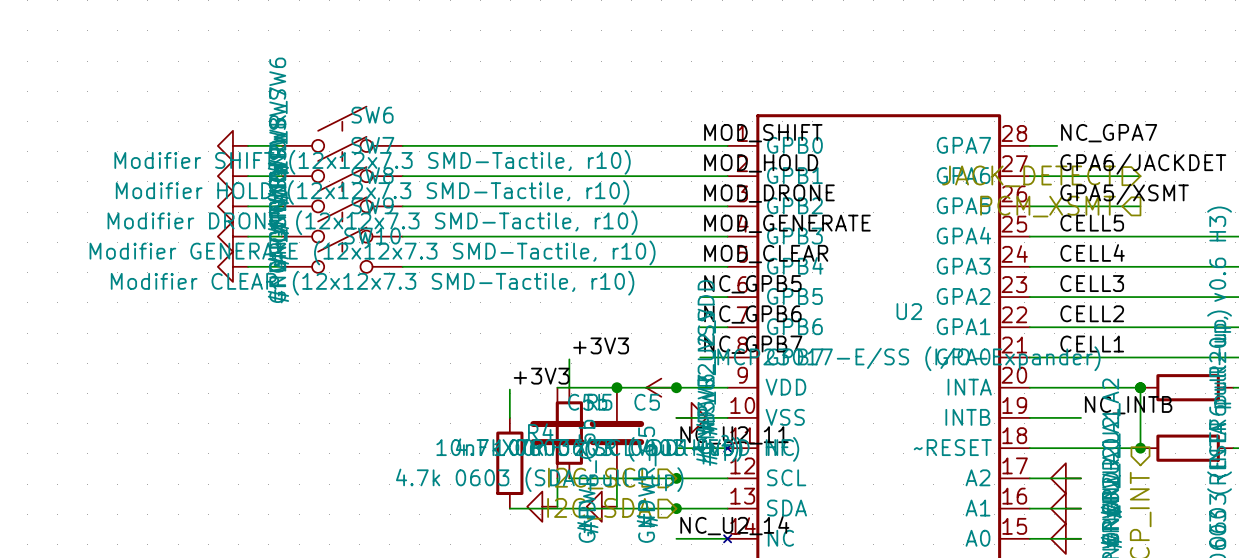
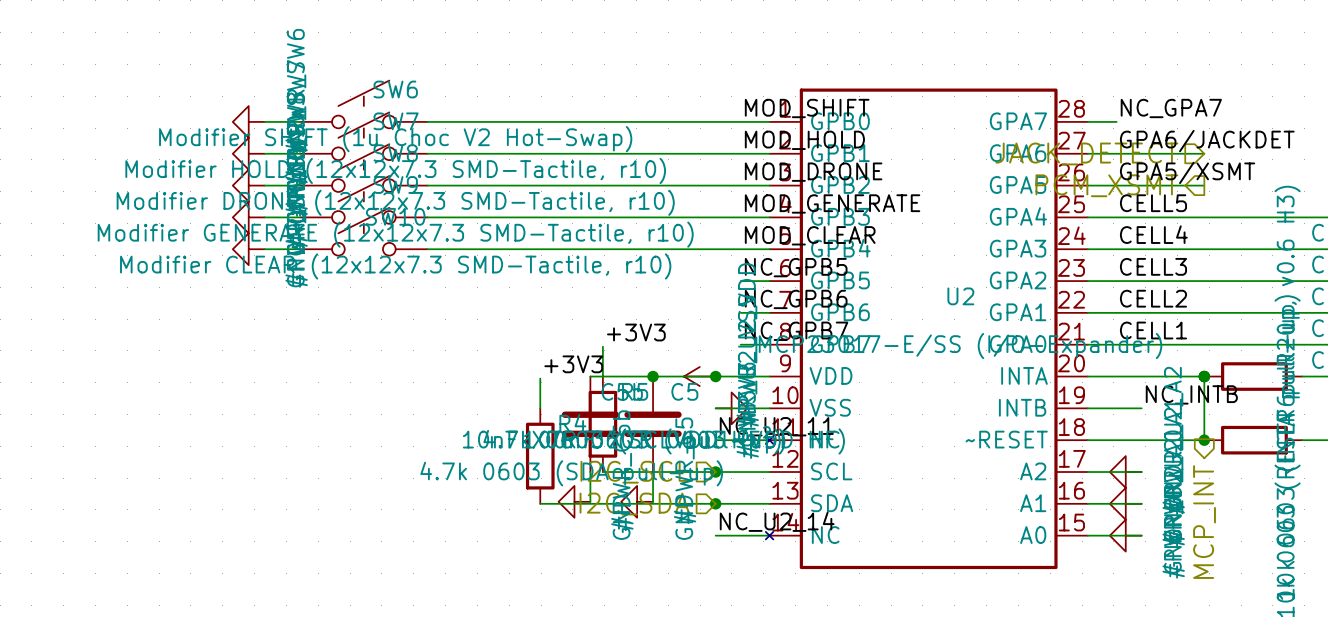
SW6 value: Modifier SHIFT (12x12x7.3 SMD-Tactile, r10) (372, 162) -> Modifier SHIFT (1u Choc V2 Hot-Swap) (395, 139)

